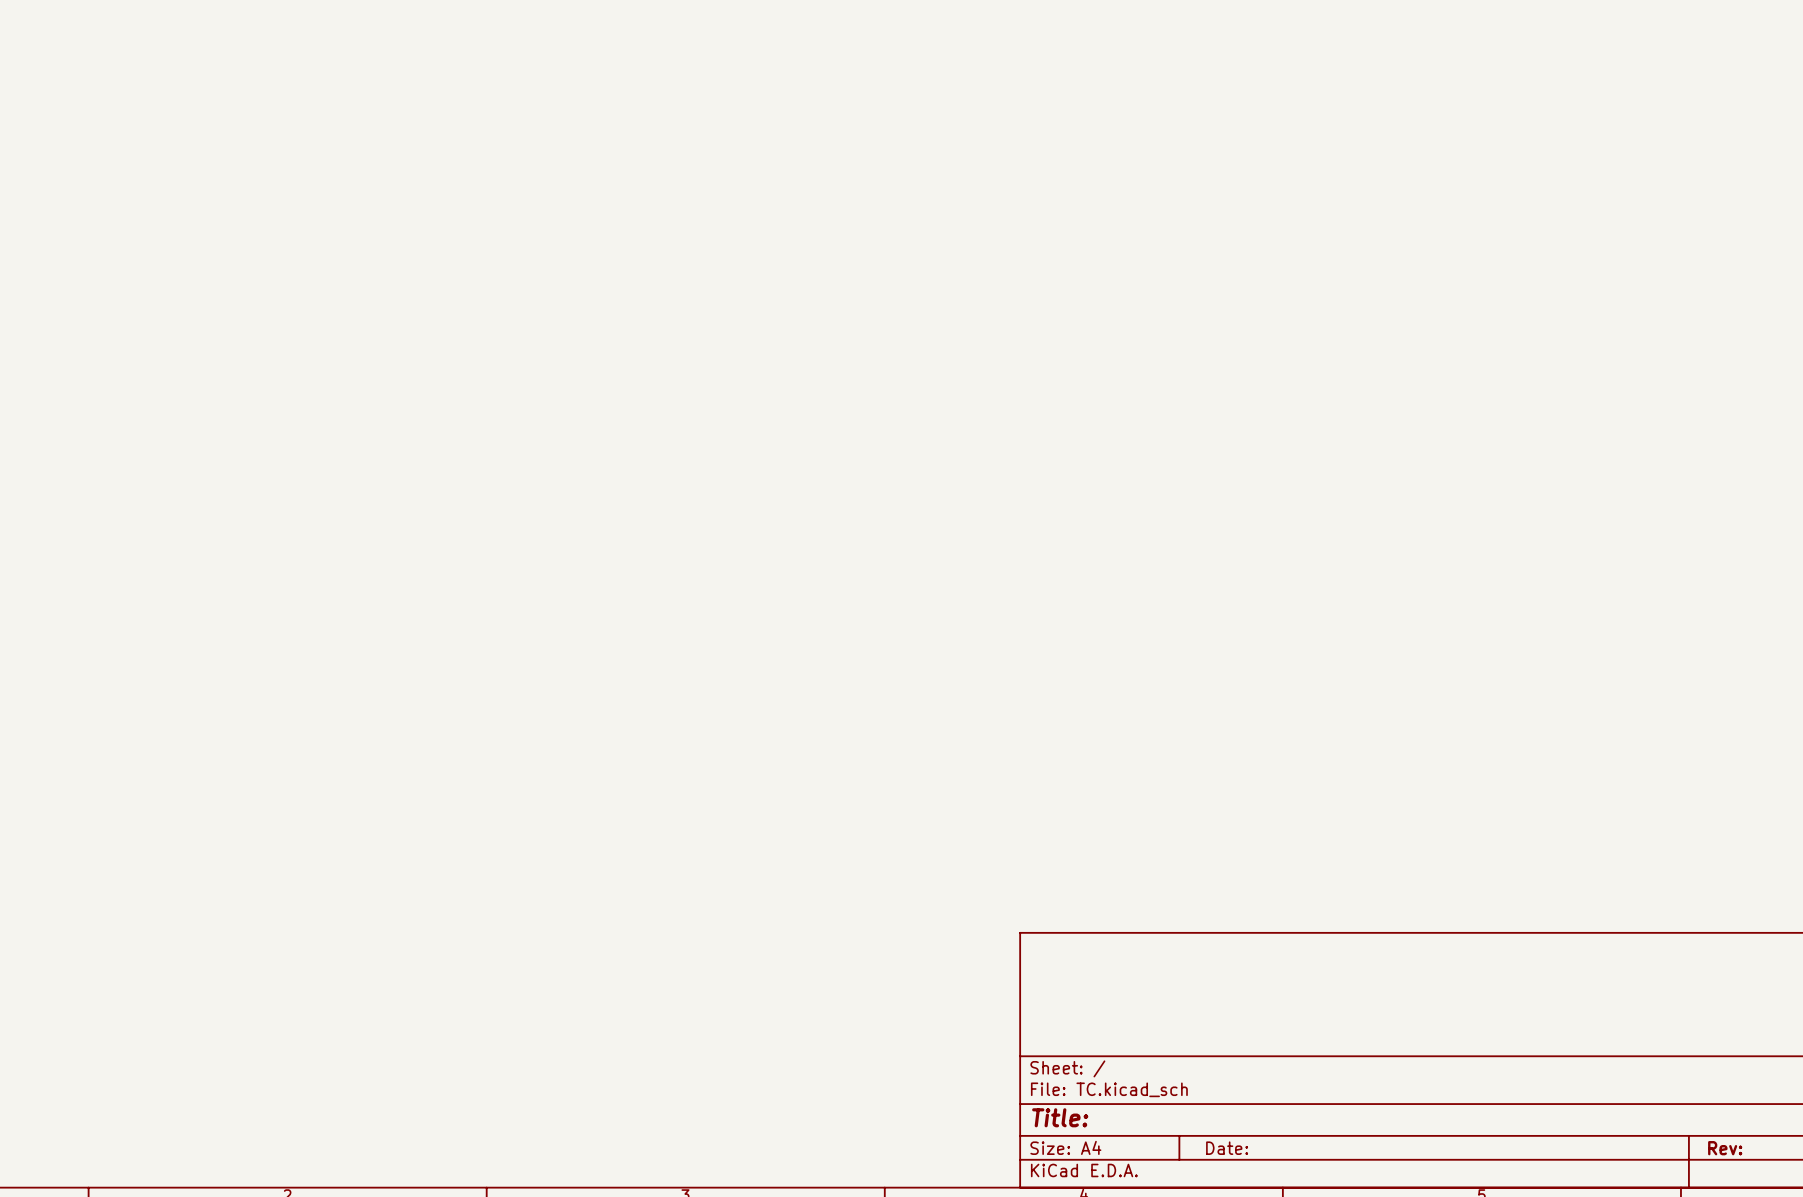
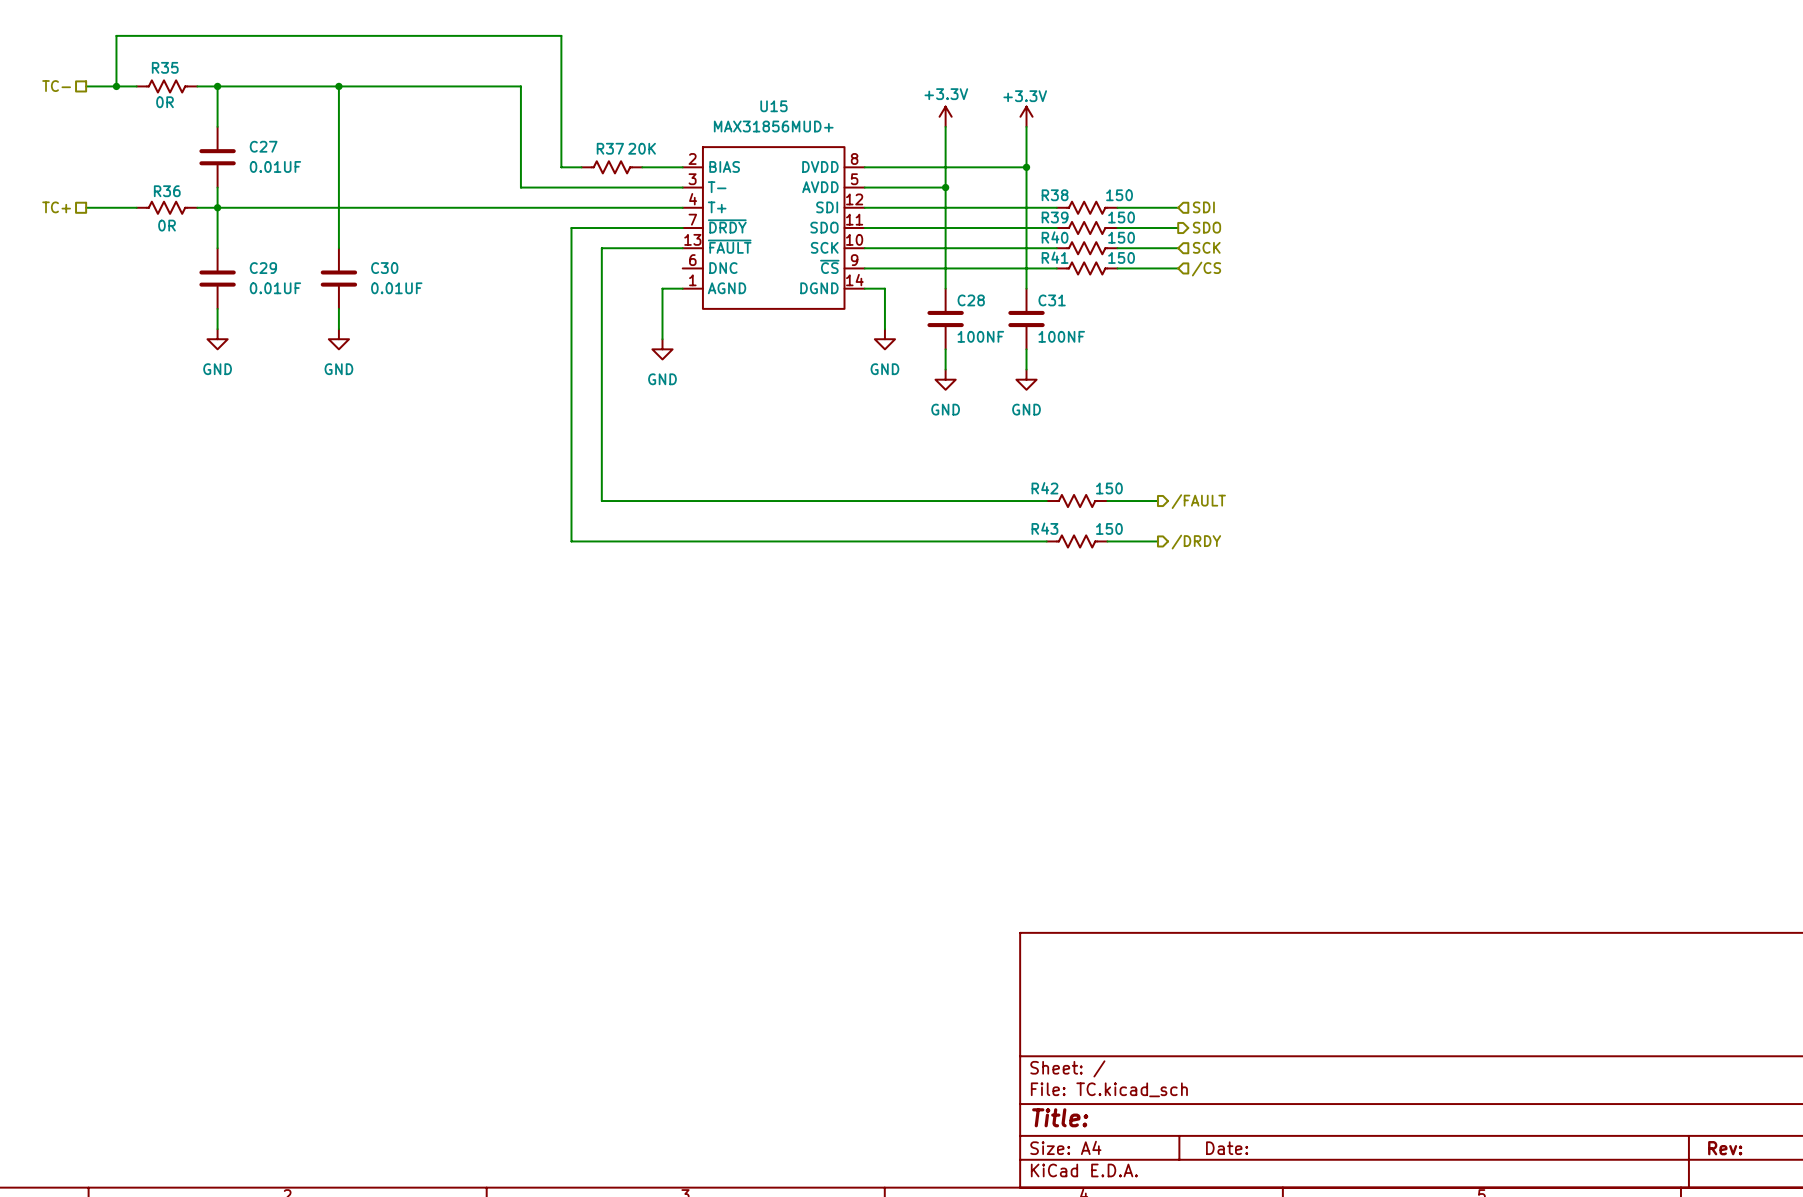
hierarchical label: none -> TC- (56, 86)
wire: none -> (86, 86) (136, 86)
wire: none -> (116, 86) (116, 35) (561, 35) (561, 167) (581, 167)
junction: none -> (116, 86)
R35: none -> 0R (167, 86)
wire: none -> (197, 86) (520, 86) (520, 187) (682, 187)
wire: none -> (217, 86) (217, 126)
junction: none -> (217, 86)
wire: none -> (338, 86) (338, 248)
junction: none -> (338, 86)
power symbol: none -> +3.3V (945, 116)
power symbol: none -> +3.3V (1026, 116)
wire: none -> (945, 126) (945, 288)
wire: none -> (1026, 126) (1026, 288)
C27: none -> 0.01UF (217, 157)
R37: none -> 20K (611, 167)
wire: none -> (642, 167) (682, 167)
wire: none -> (864, 167) (1026, 167)
junction: none -> (1026, 167)
wire: none -> (217, 187) (217, 248)
wire: none -> (864, 187) (945, 187)
junction: none -> (945, 187)
hierarchical label: none -> TC+ (56, 207)
wire: none -> (86, 207) (136, 207)
R36: none -> 0R (167, 207)
wire: none -> (197, 207) (682, 207)
junction: none -> (217, 207)
wire: none -> (864, 207) (1056, 207)
R38: none -> 150 (1087, 207)
wire: none -> (1117, 207) (1178, 207)
hierarchical label: none -> SDI (1203, 207)
hierarchical label: none -> SDO (1206, 227)
wire: none -> (682, 228) (571, 228) (571, 541) (1046, 541)
U15: none -> MAX31856MUD+ (773, 228)
wire: none -> (864, 228) (1056, 228)
R39: none -> 150 (1087, 228)
wire: none -> (1117, 228) (1178, 228)
hierarchical label: none -> SCK (1206, 247)
wire: none -> (682, 248) (601, 248) (601, 501) (1046, 501)
wire: none -> (864, 248) (1056, 248)
R40: none -> 150 (1087, 248)
wire: none -> (1117, 248) (1178, 248)
wire: none -> (864, 268) (1056, 268)
R41: none -> 150 (1087, 268)
wire: none -> (1117, 268) (1178, 268)
hierarchical label: none -> /CS (1206, 269)
C29: none -> 0.01UF (217, 278)
C30: none -> 0.01UF (338, 278)
wire: none -> (682, 288) (662, 288) (662, 339)
wire: none -> (864, 288) (884, 288) (884, 329)
wire: none -> (217, 308) (217, 329)
wire: none -> (338, 308) (338, 329)
C28: none -> 100NF (945, 319)
C31: none -> 100NF (1026, 319)
power symbol: none -> GND (217, 339)
power symbol: none -> GND (338, 339)
power symbol: none -> GND (884, 339)
power symbol: none -> GND (662, 349)
wire: none -> (945, 349) (945, 369)
wire: none -> (1026, 349) (1026, 369)
power symbol: none -> GND (945, 379)
power symbol: none -> GND (1026, 379)
R42: none -> 150 (1077, 501)
wire: none -> (1107, 501) (1157, 501)
hierarchical label: none -> /FAULT (1198, 501)
R43: none -> 150 (1077, 541)
wire: none -> (1107, 541) (1157, 541)
hierarchical label: none -> /DRDY (1196, 542)

